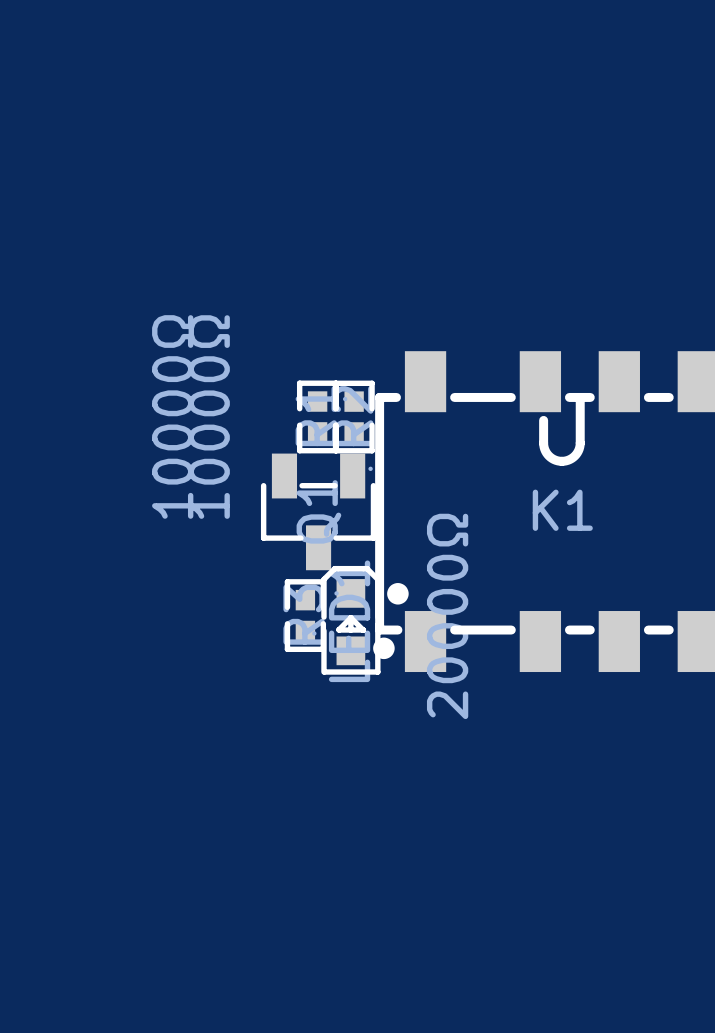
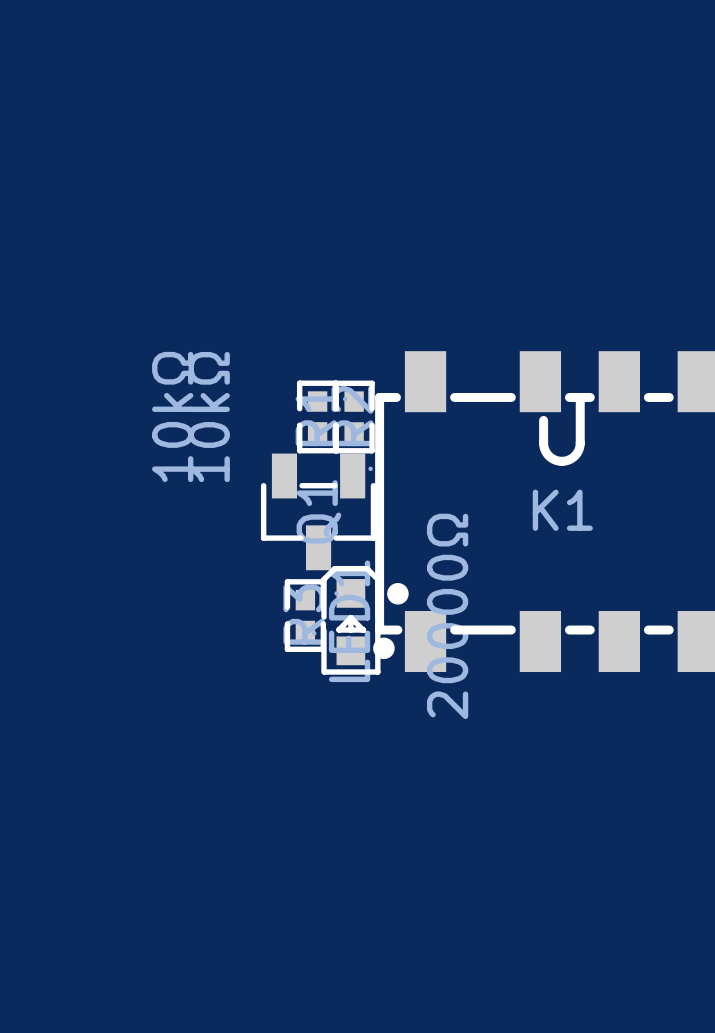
part value: 10000Ω (172, 416) -> 10kΩ (172, 416)
part value: 10000Ω (209, 417) -> 10kΩ (209, 417)

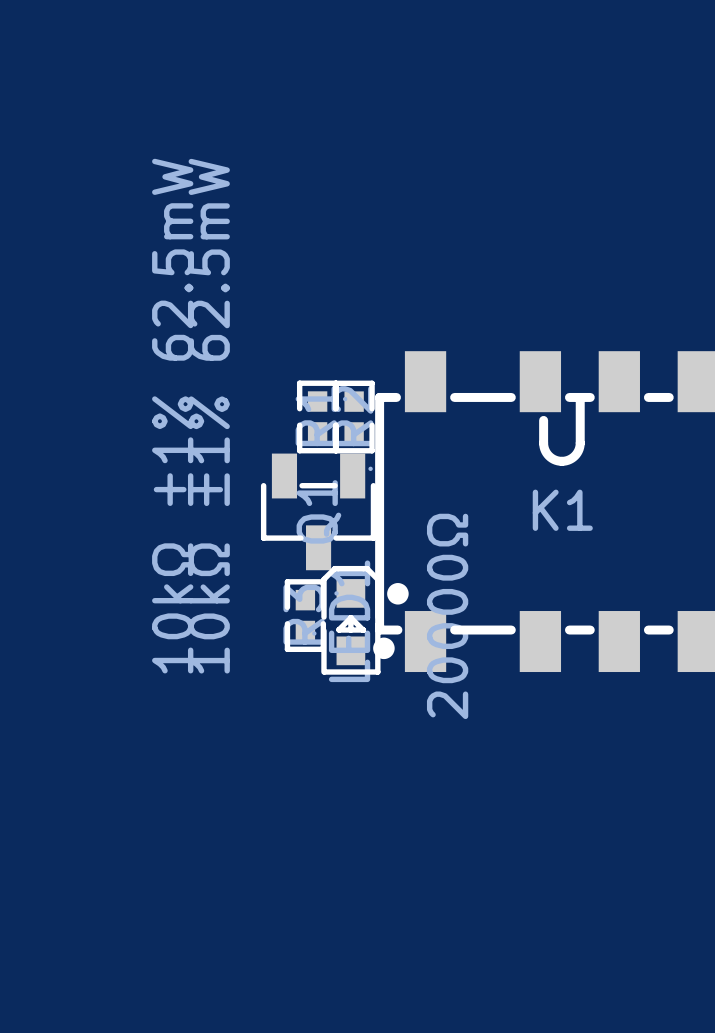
part value: 10kΩ (172, 416) -> 10kΩ ±1% 62.5mW (172, 416)
part value: 10kΩ (209, 417) -> 10kΩ ±1% 62.5mW (209, 416)

